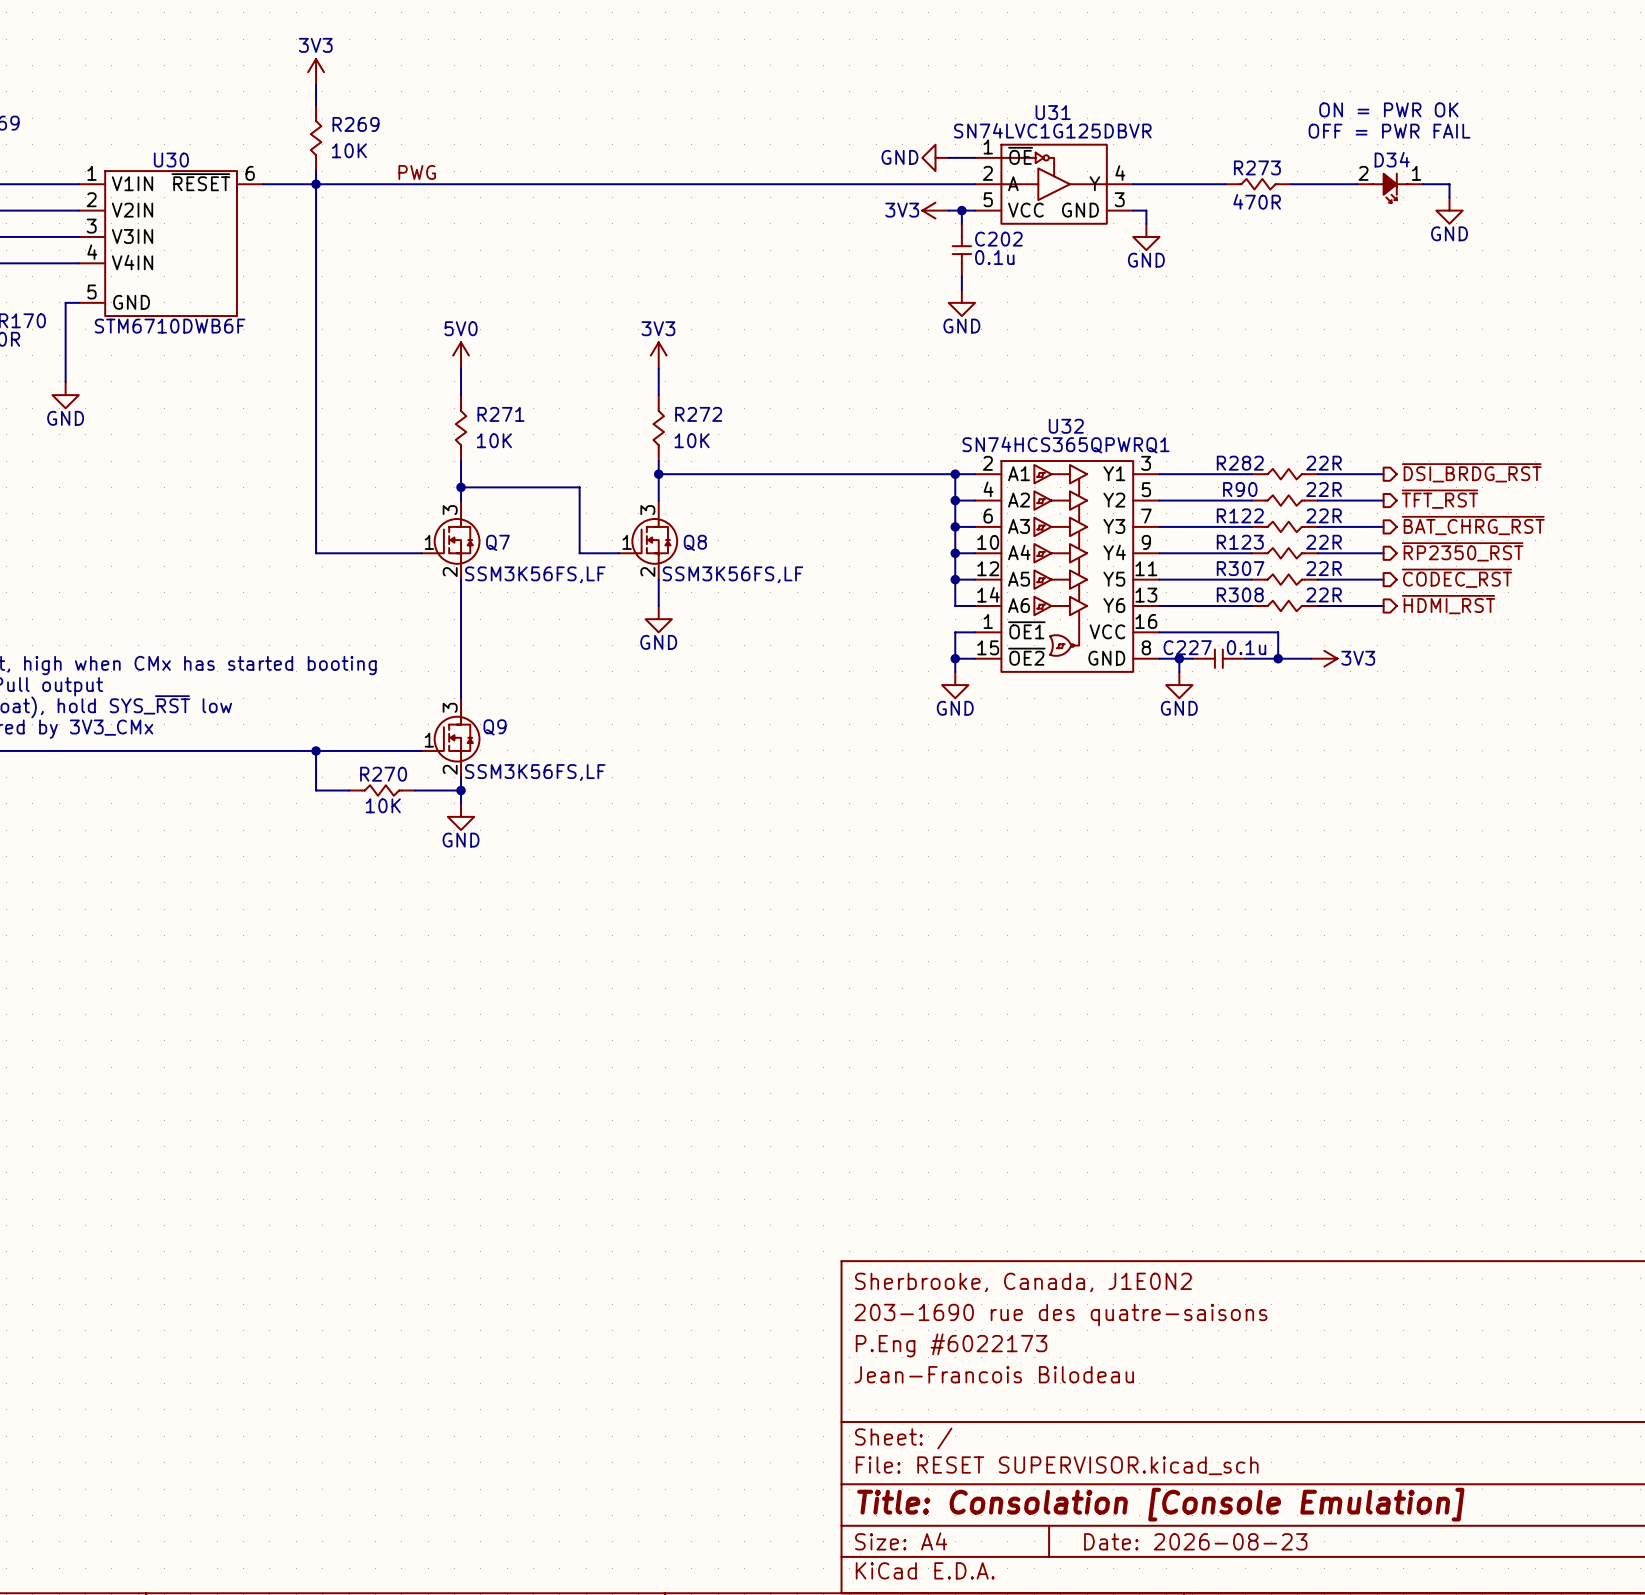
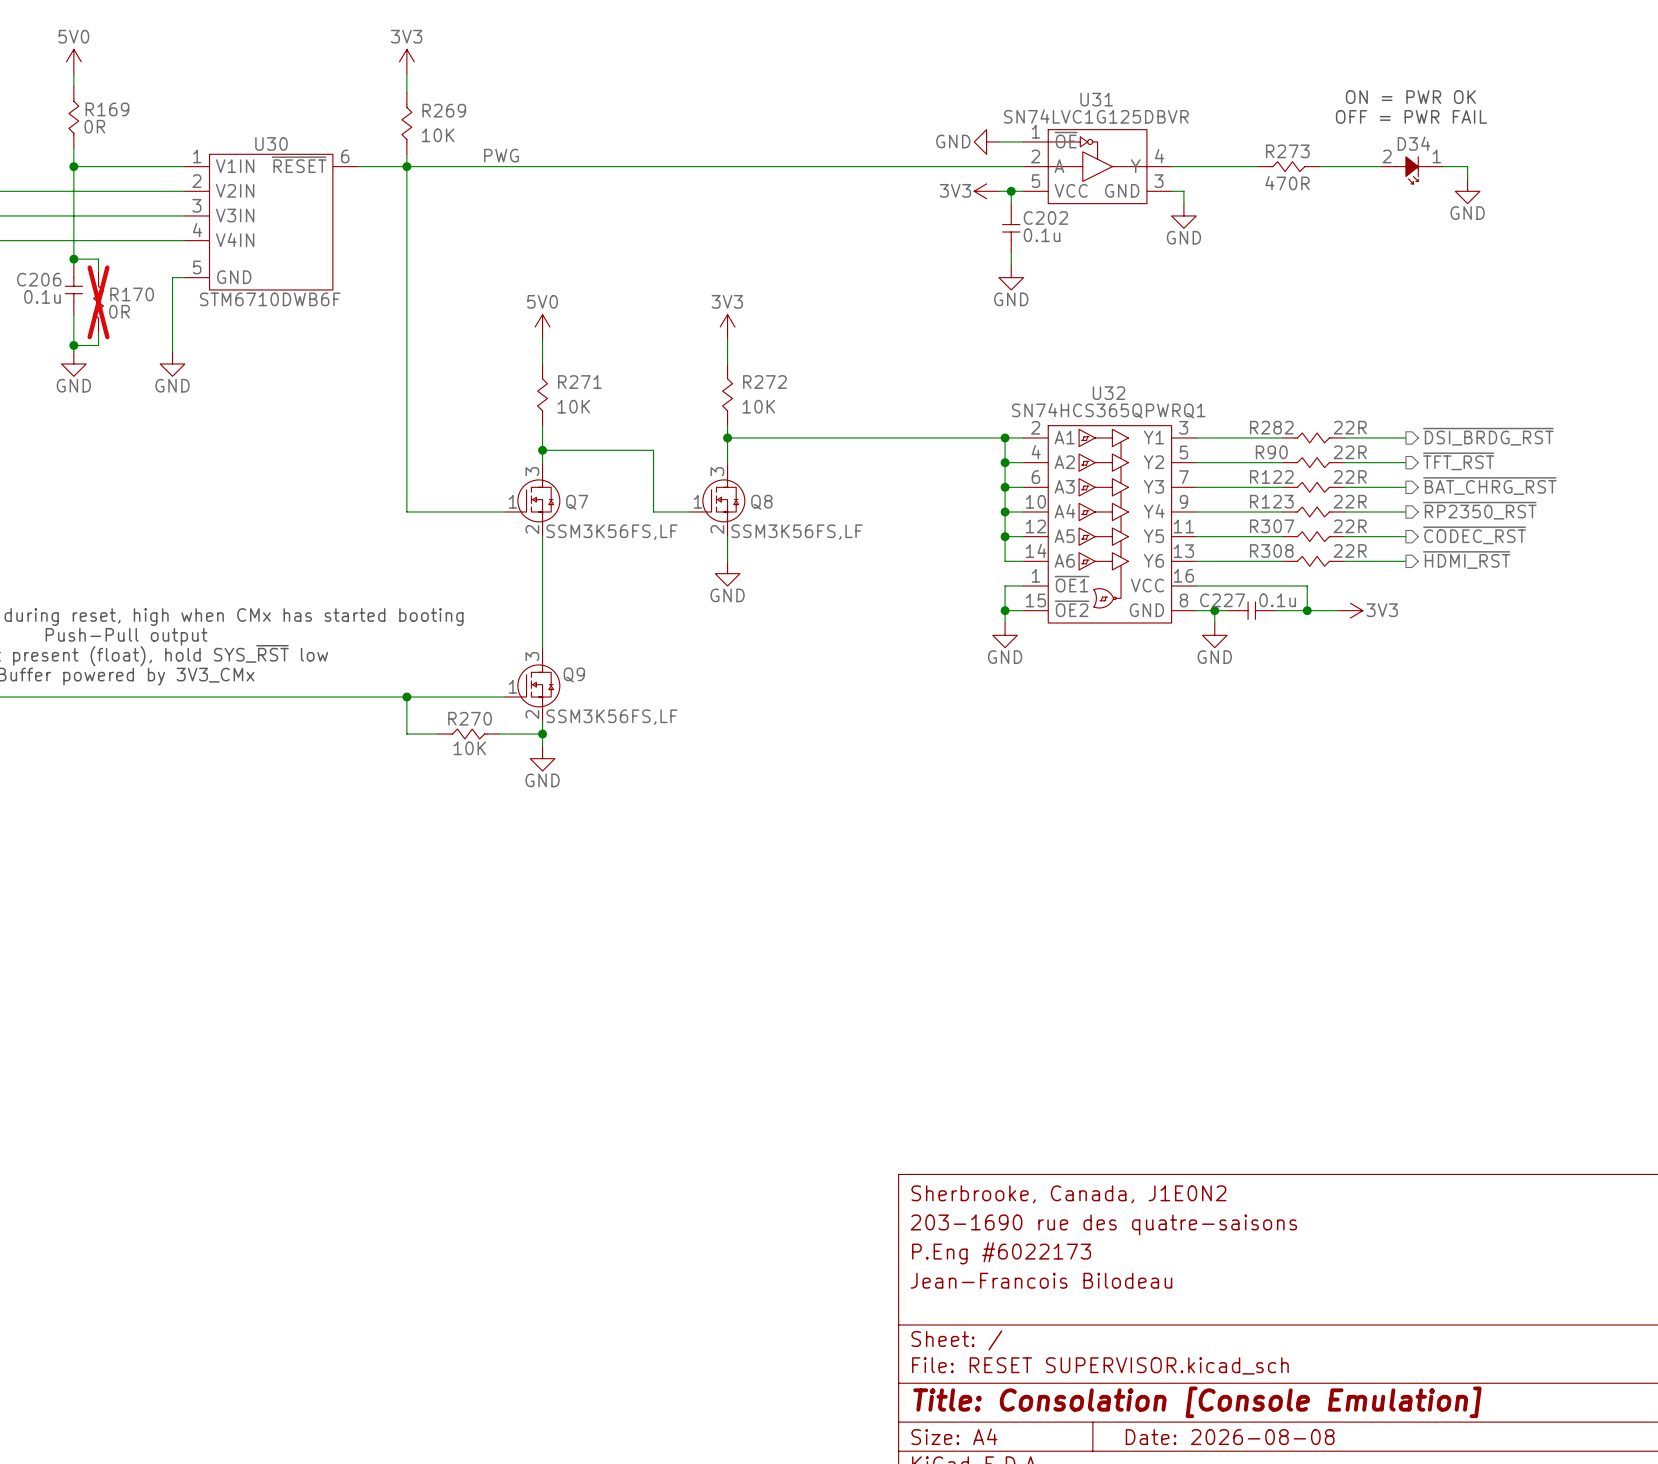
title block: Date: 2026-08-23 (1195, 1541) -> Date: 2026-08-08 (1230, 1437)

